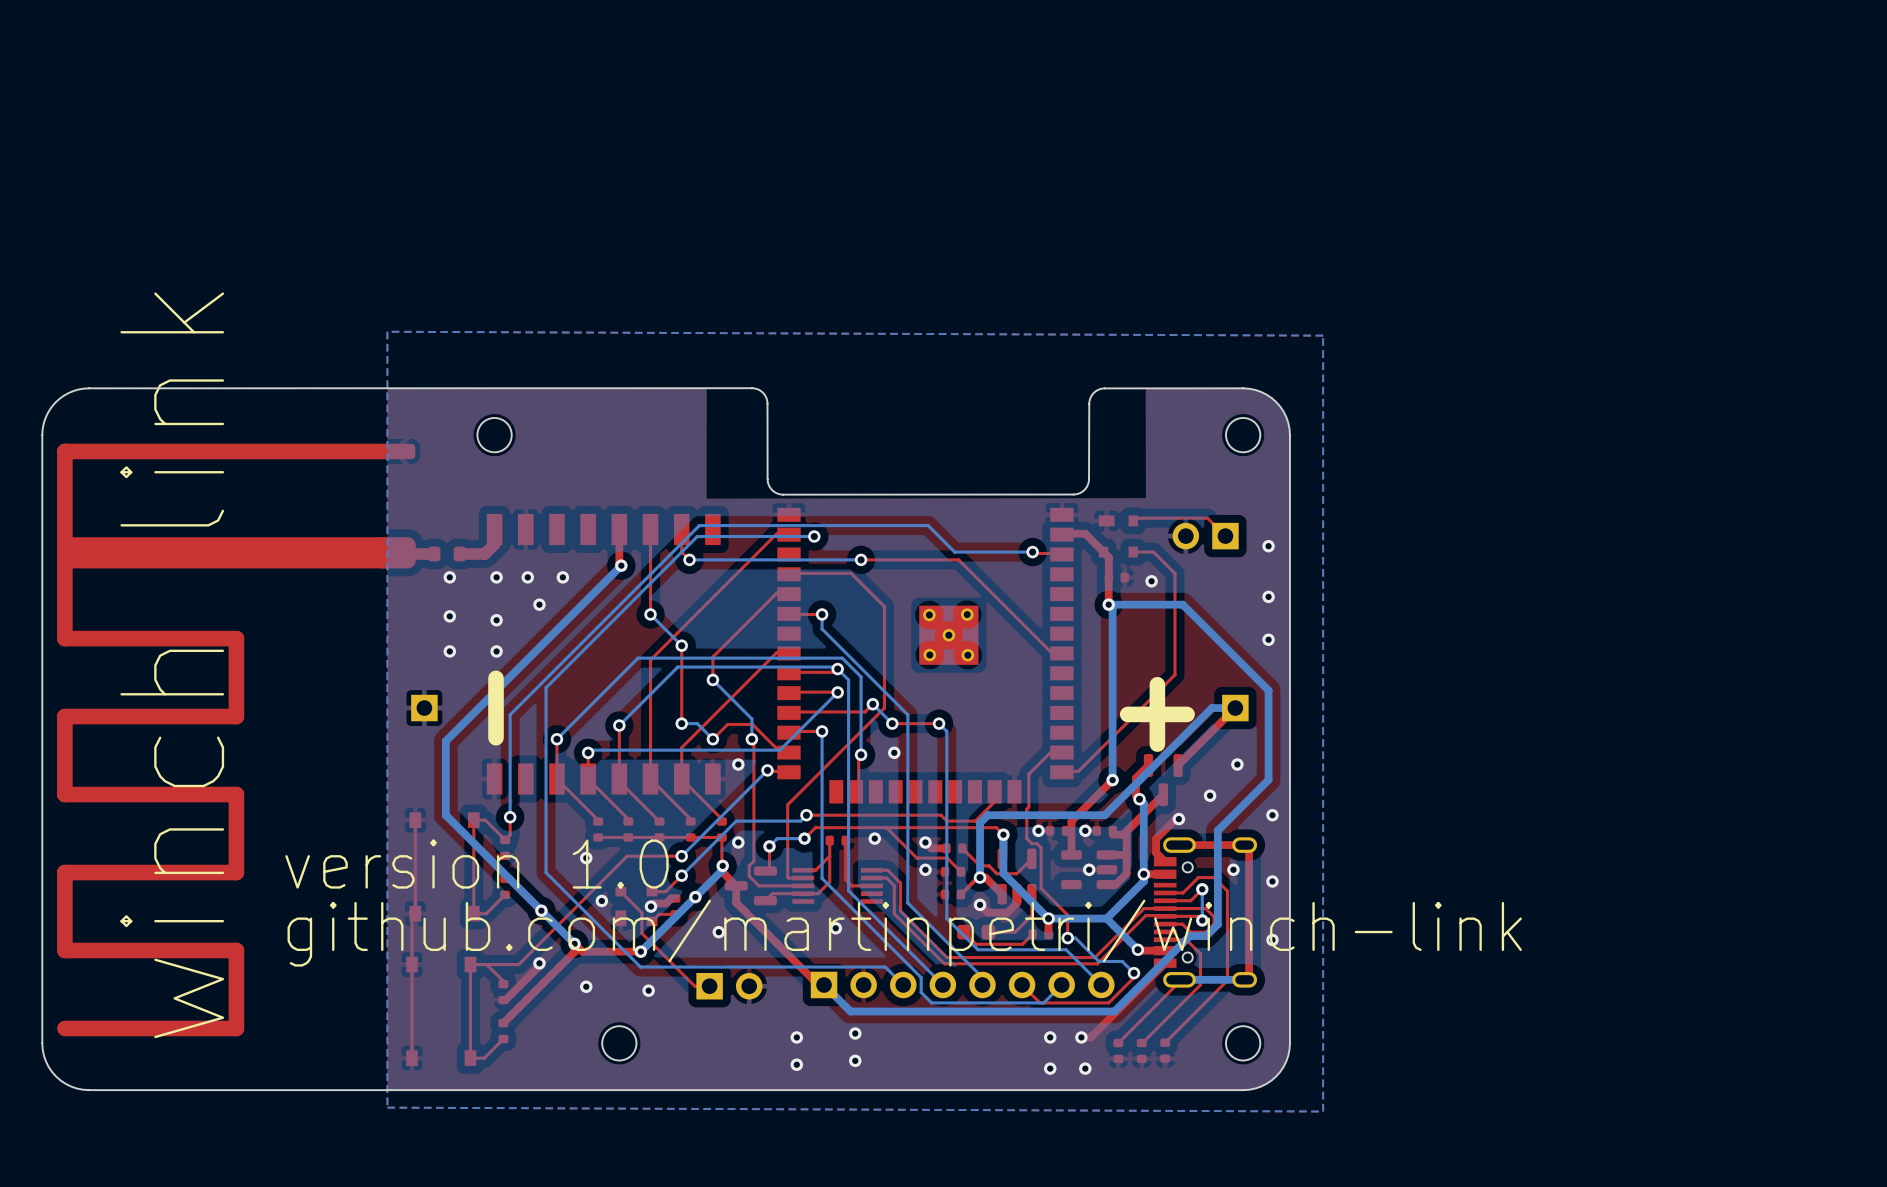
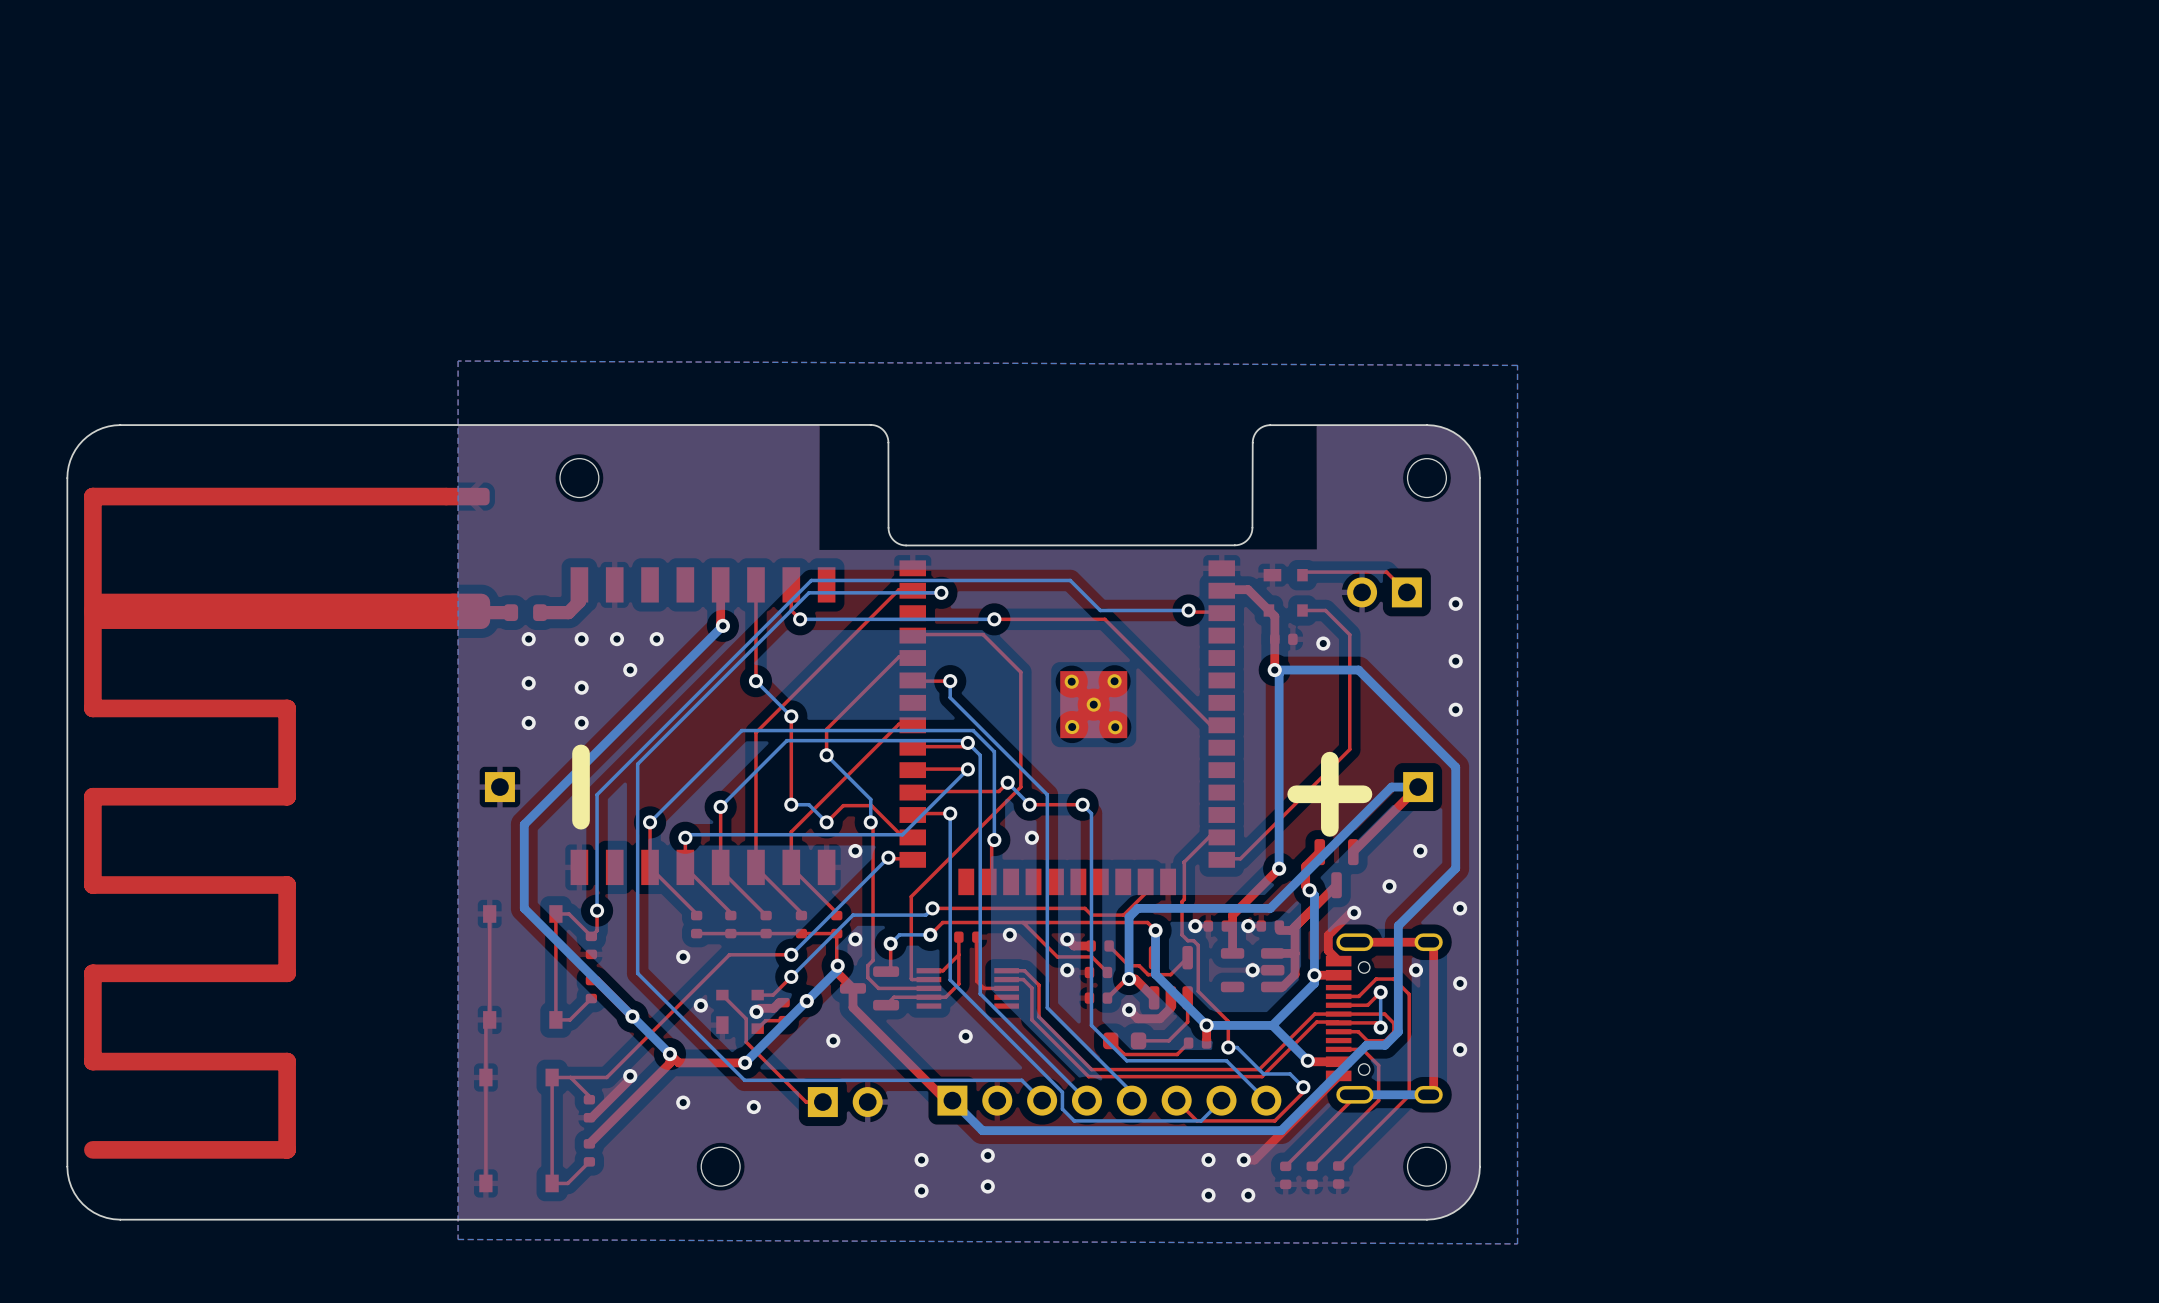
text: winch link (172, 665) -> none
text: version 1.0 (476, 864) -> none
text: github.com/martinpetri/winch-link (904, 933) -> none

